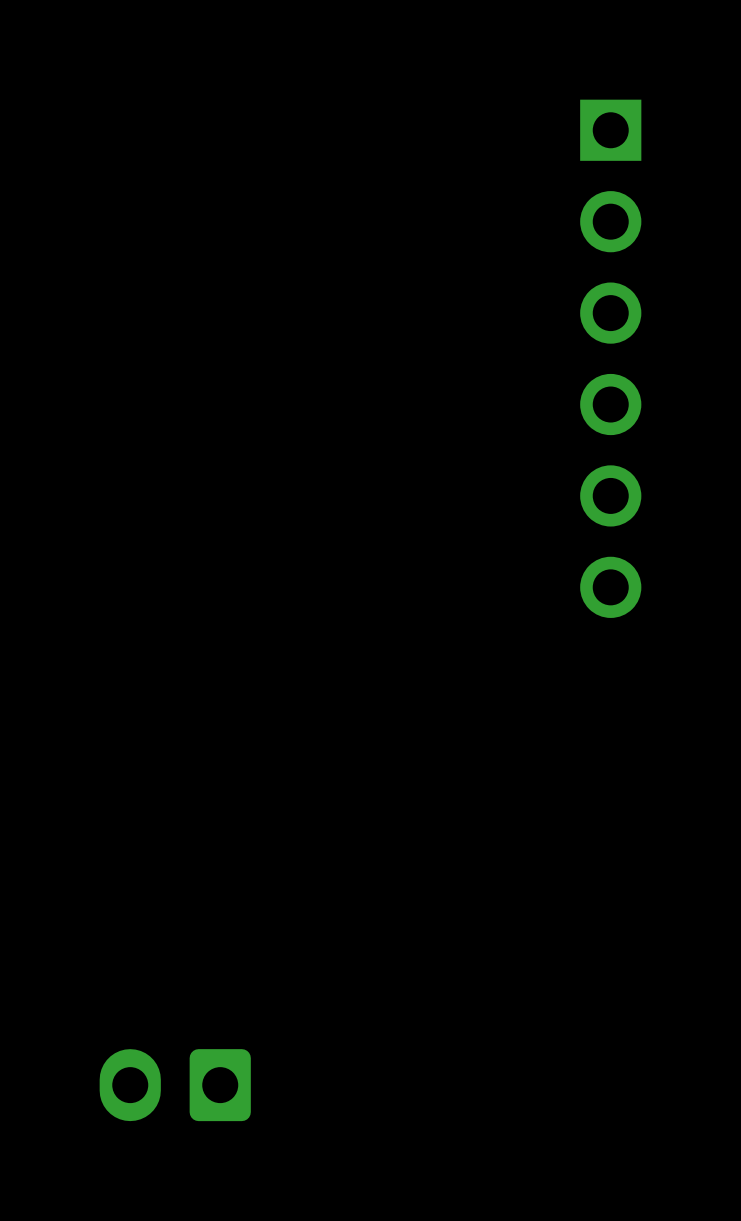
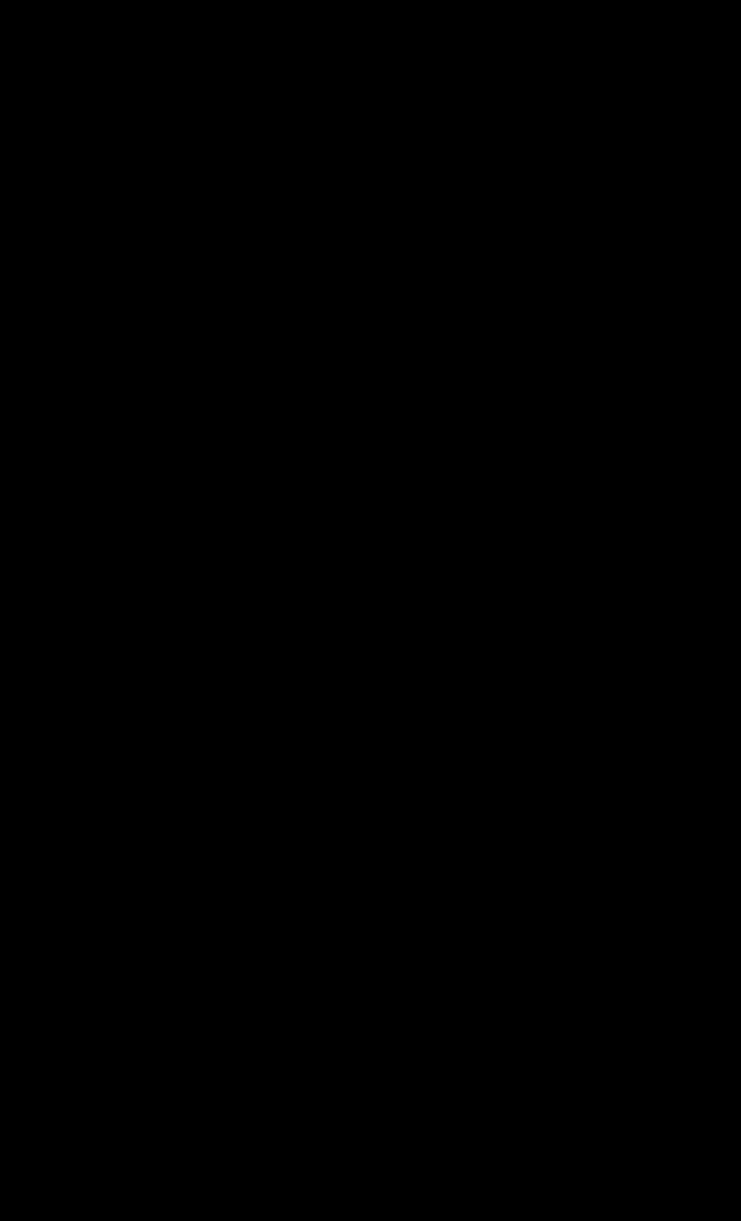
part: (610, 358) -> none
part: (175, 1085) -> none

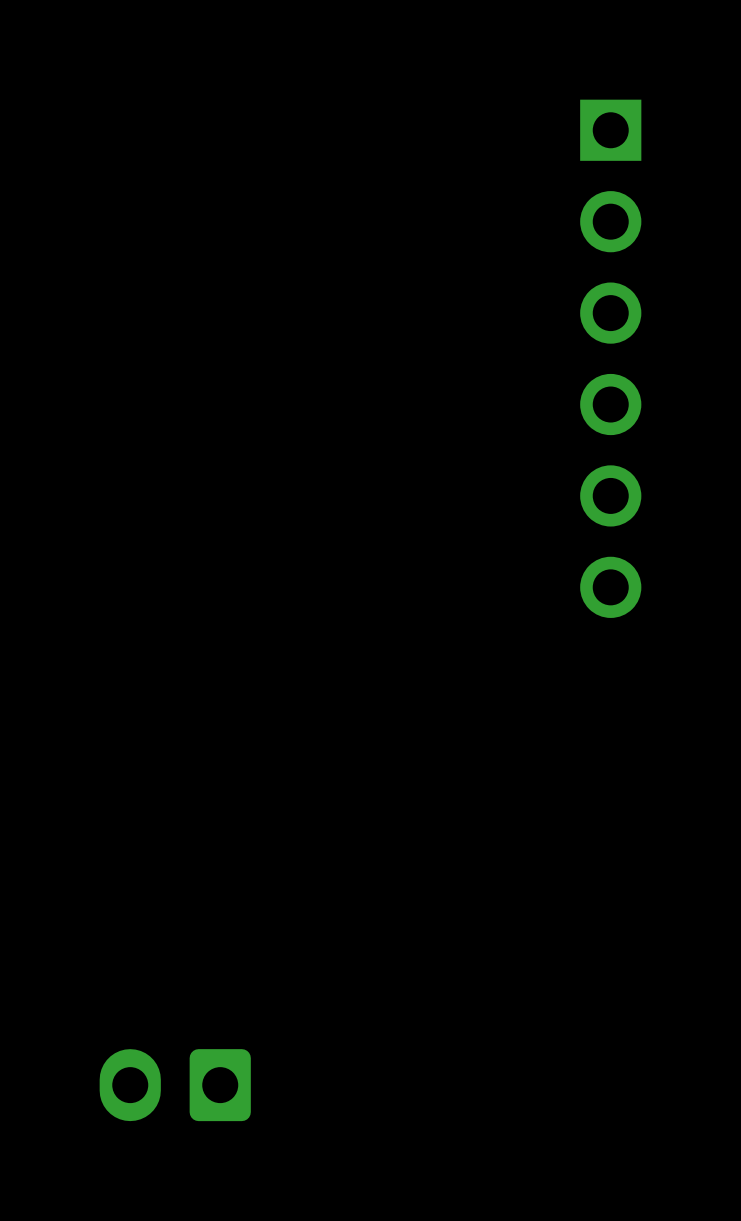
part: none -> (610, 358)
part: none -> (175, 1085)

